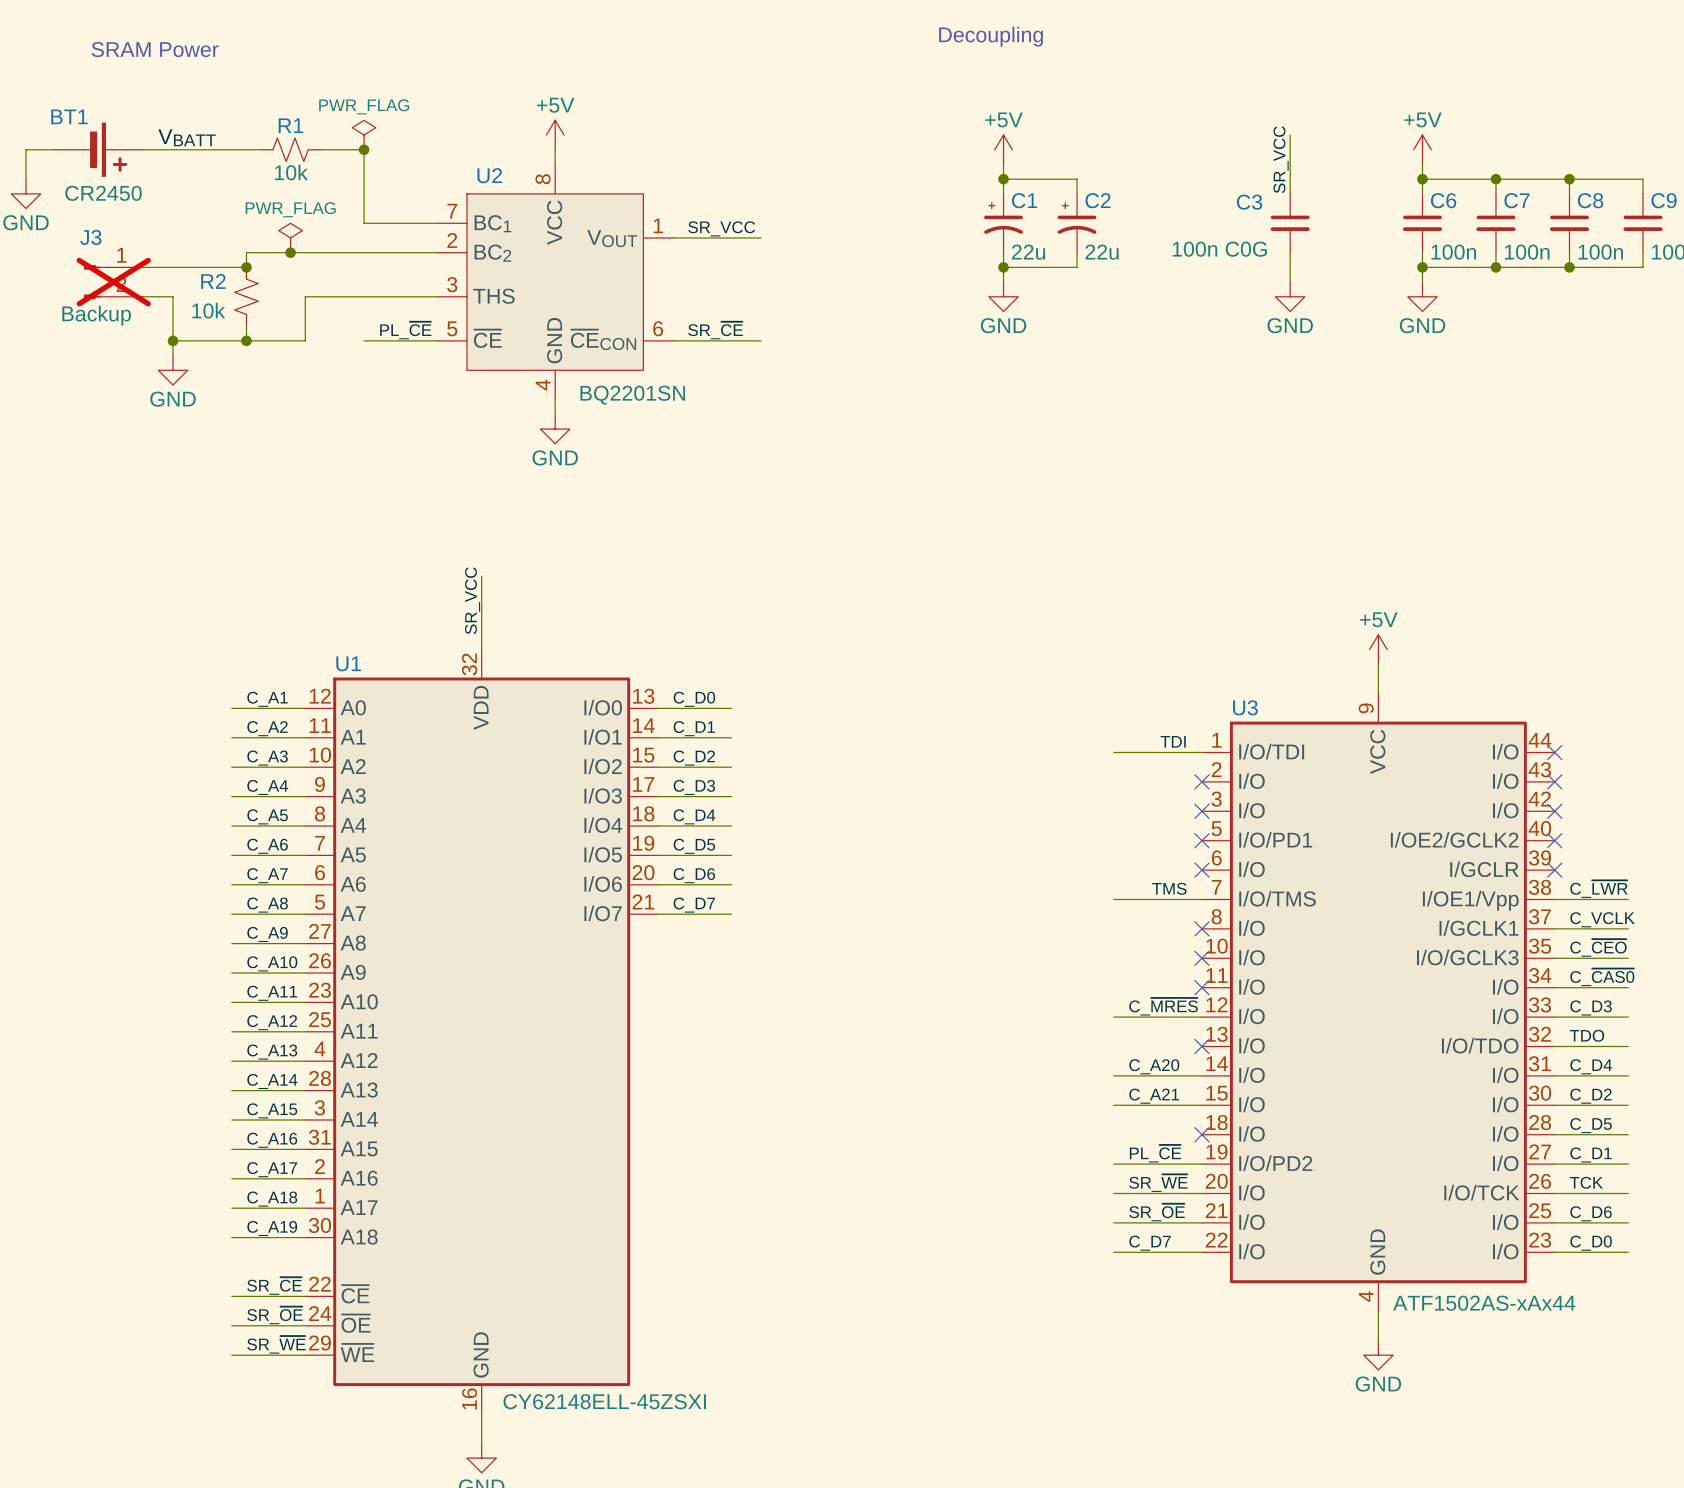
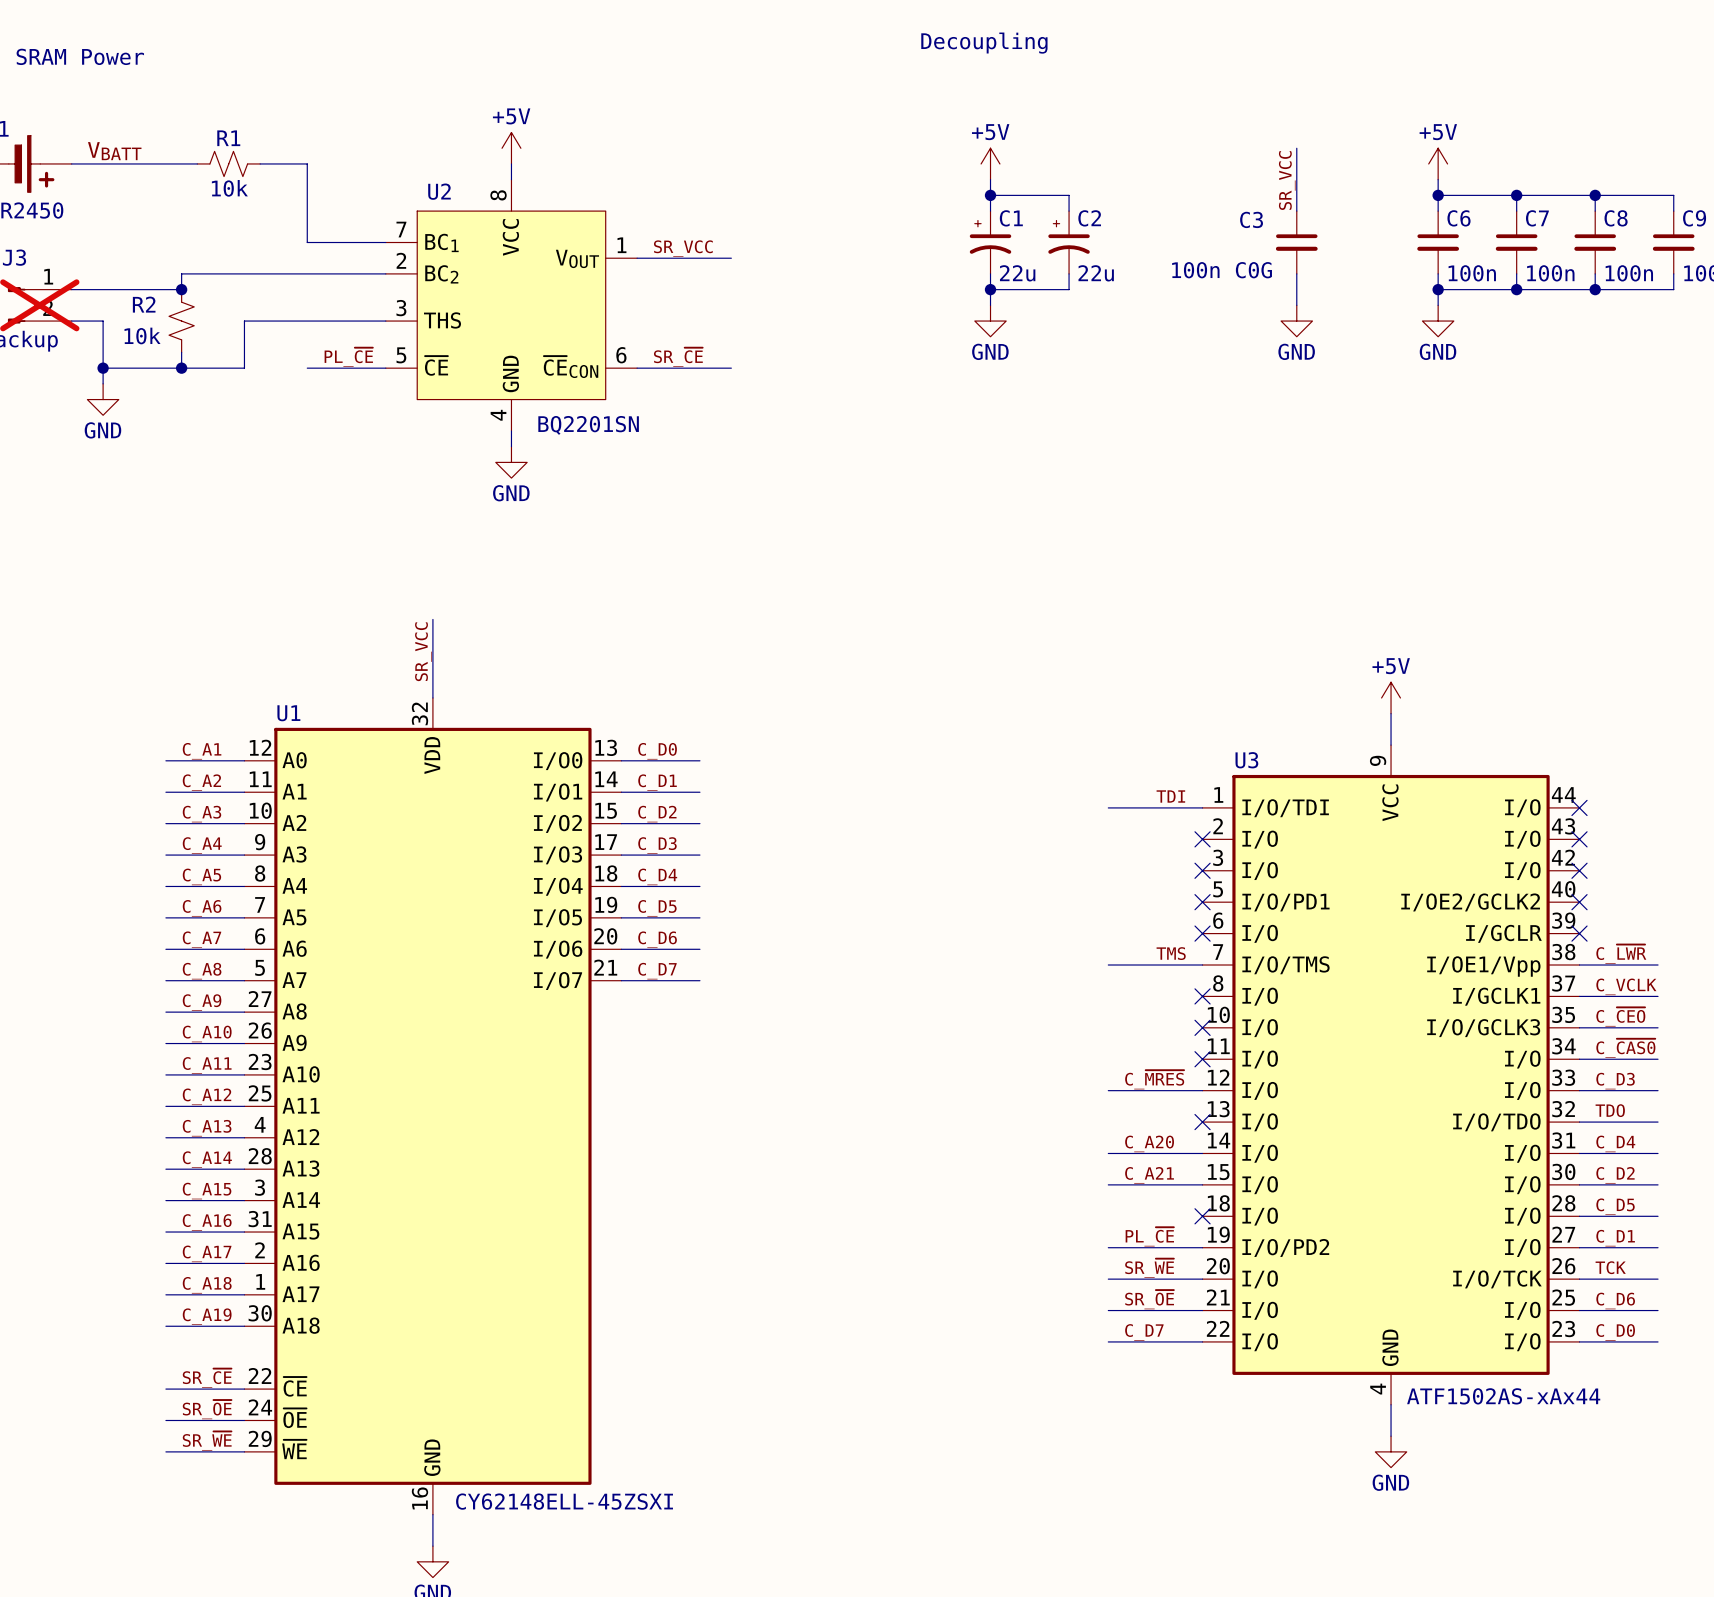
power symbol: PWR_FLAG (364, 135) -> none
junction: (364, 149) -> none
power symbol: PWR_FLAG (290, 237) -> none
junction: (290, 252) -> none

